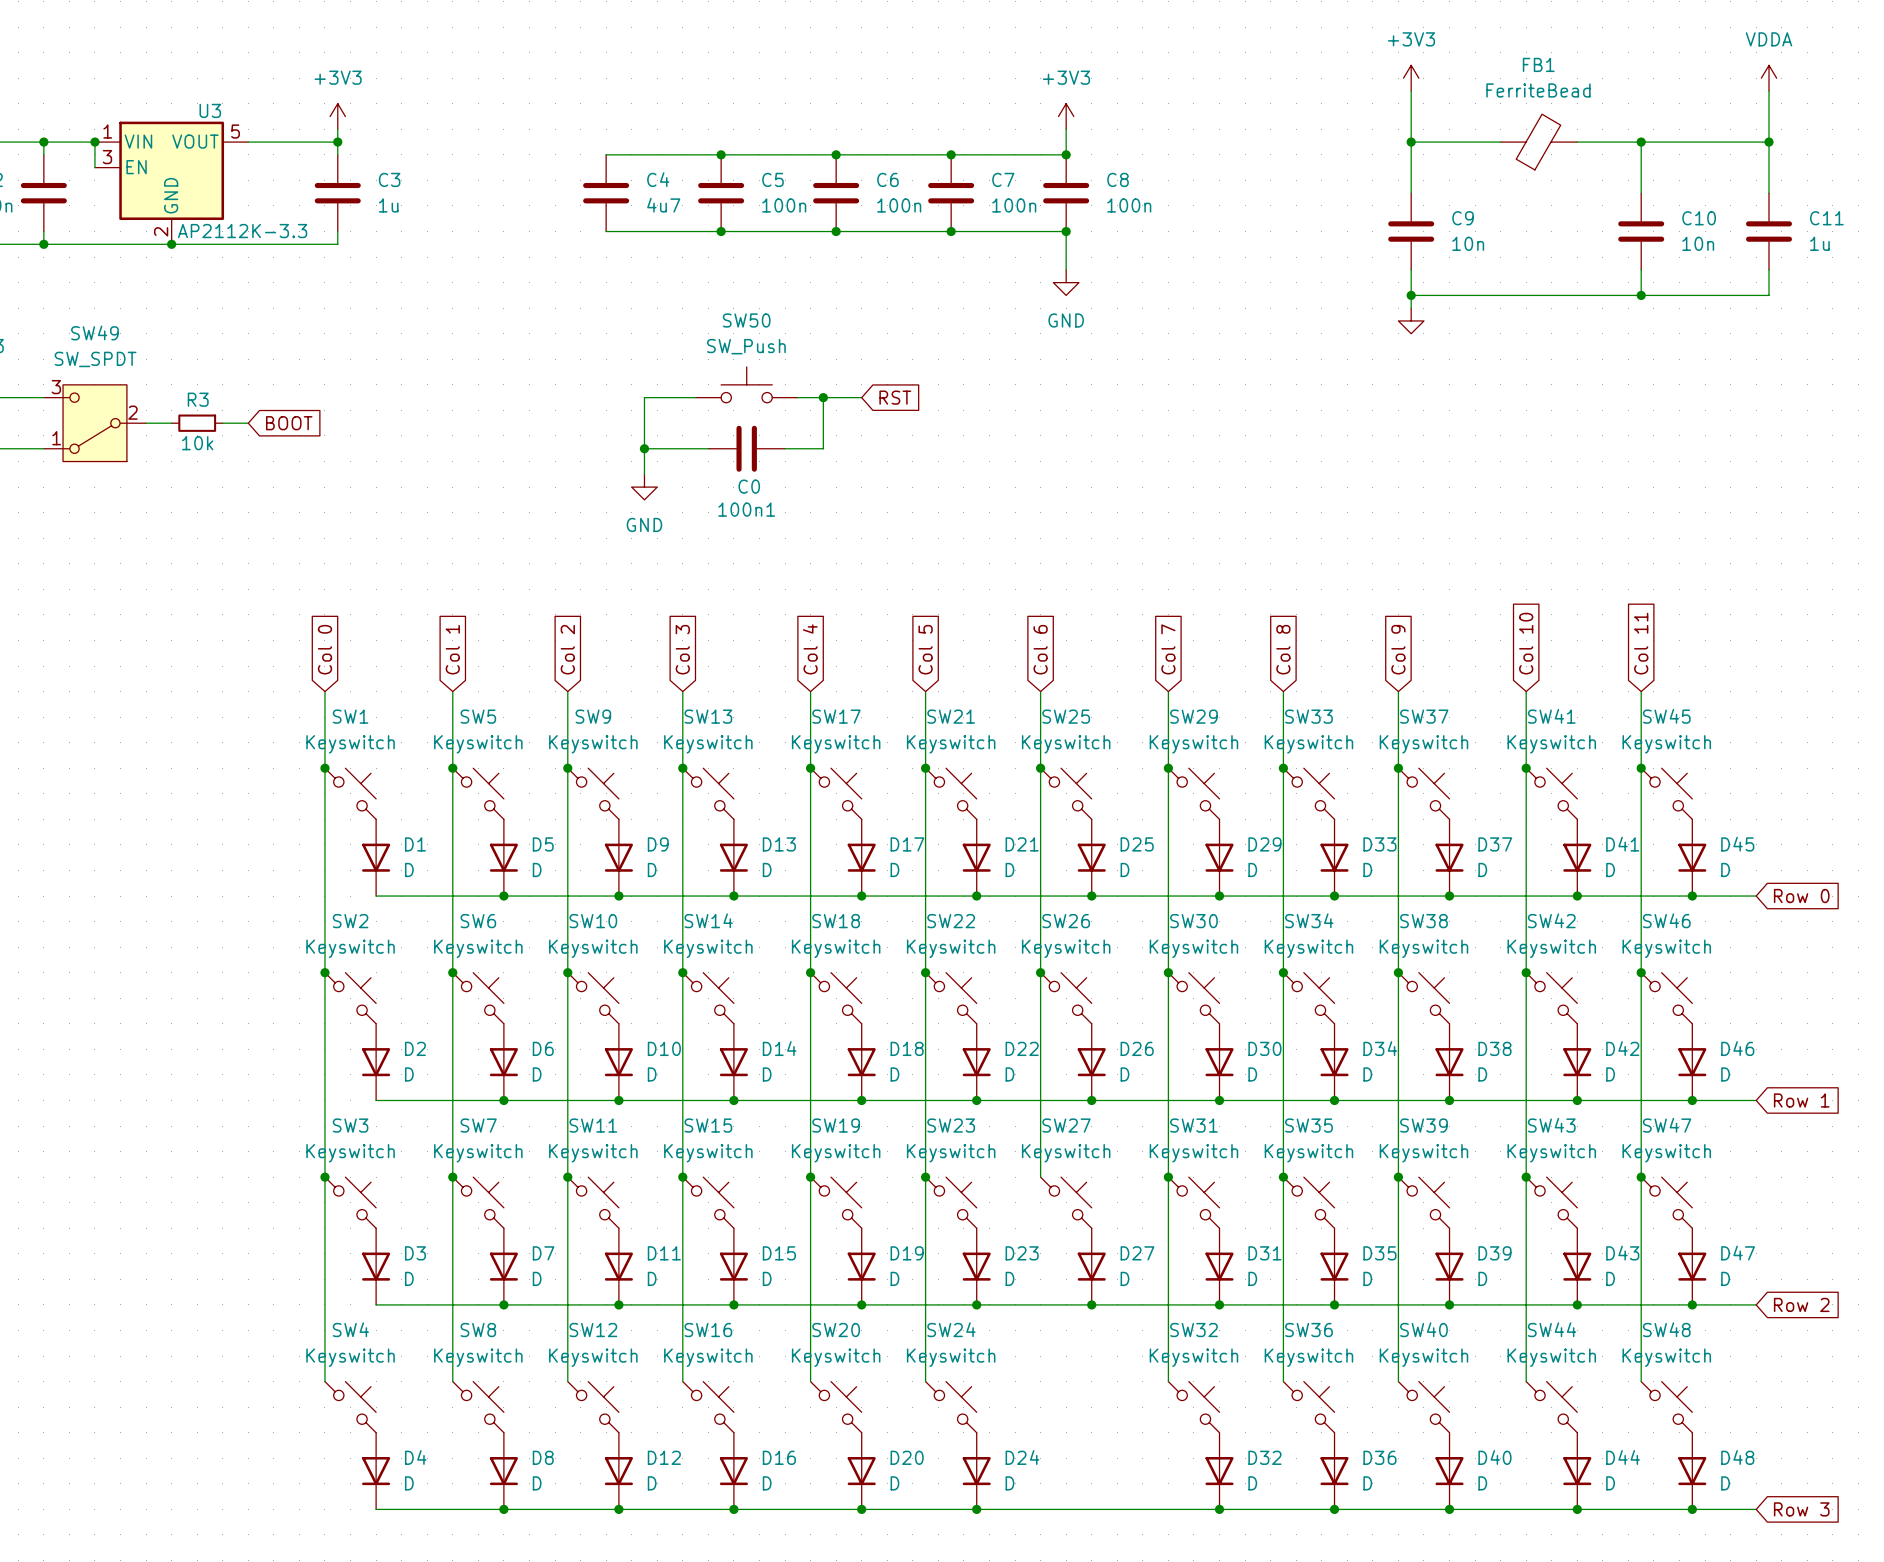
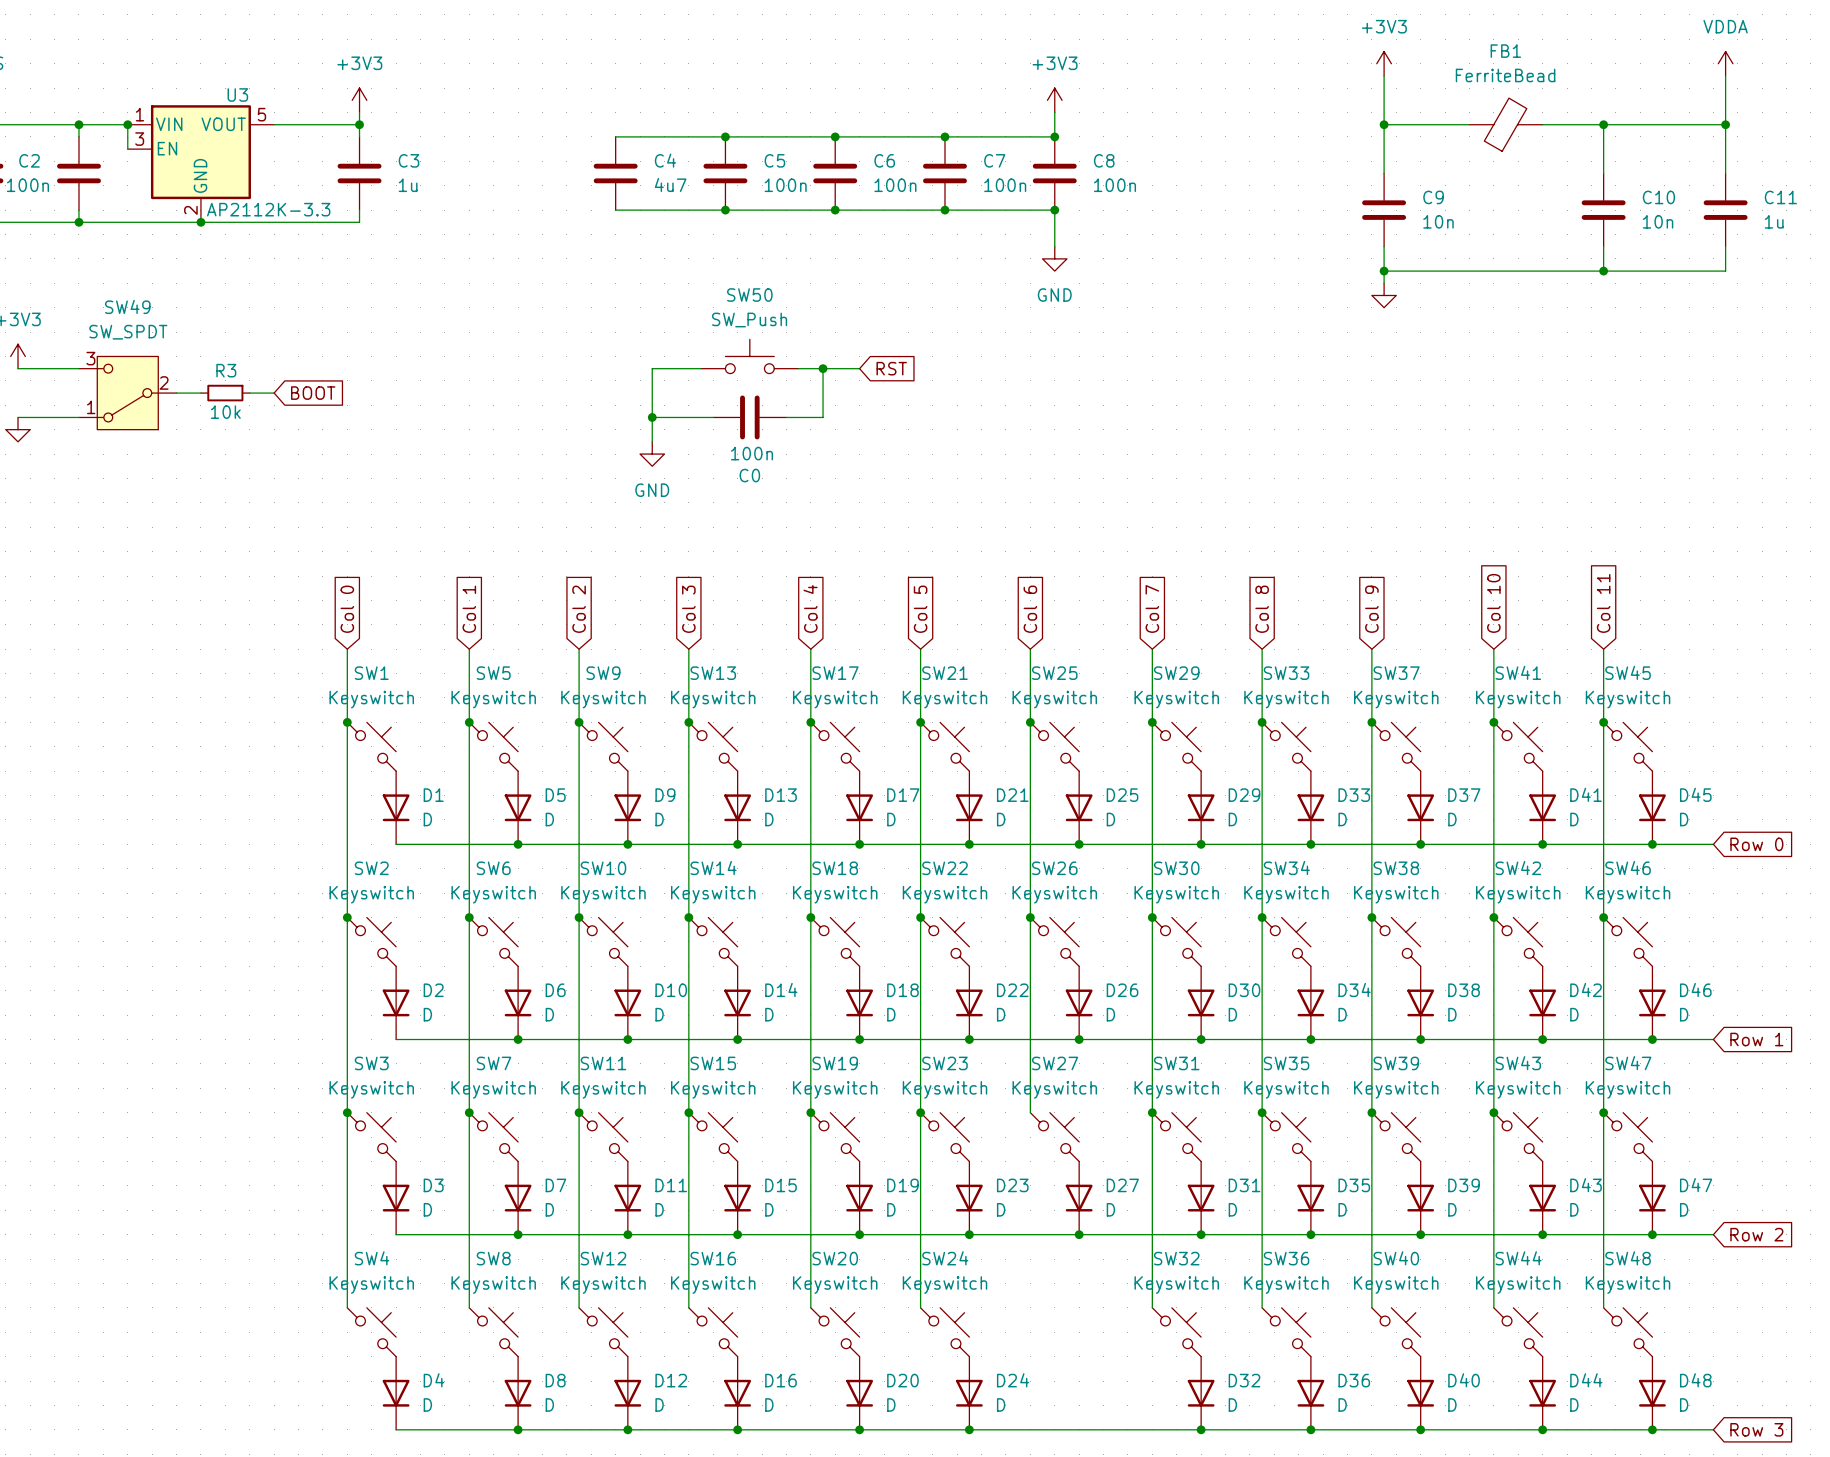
100n1 value: C0 (749, 486) -> 100n (751, 453)
100n1 name: 100n1 (746, 509) -> C0 (749, 475)

